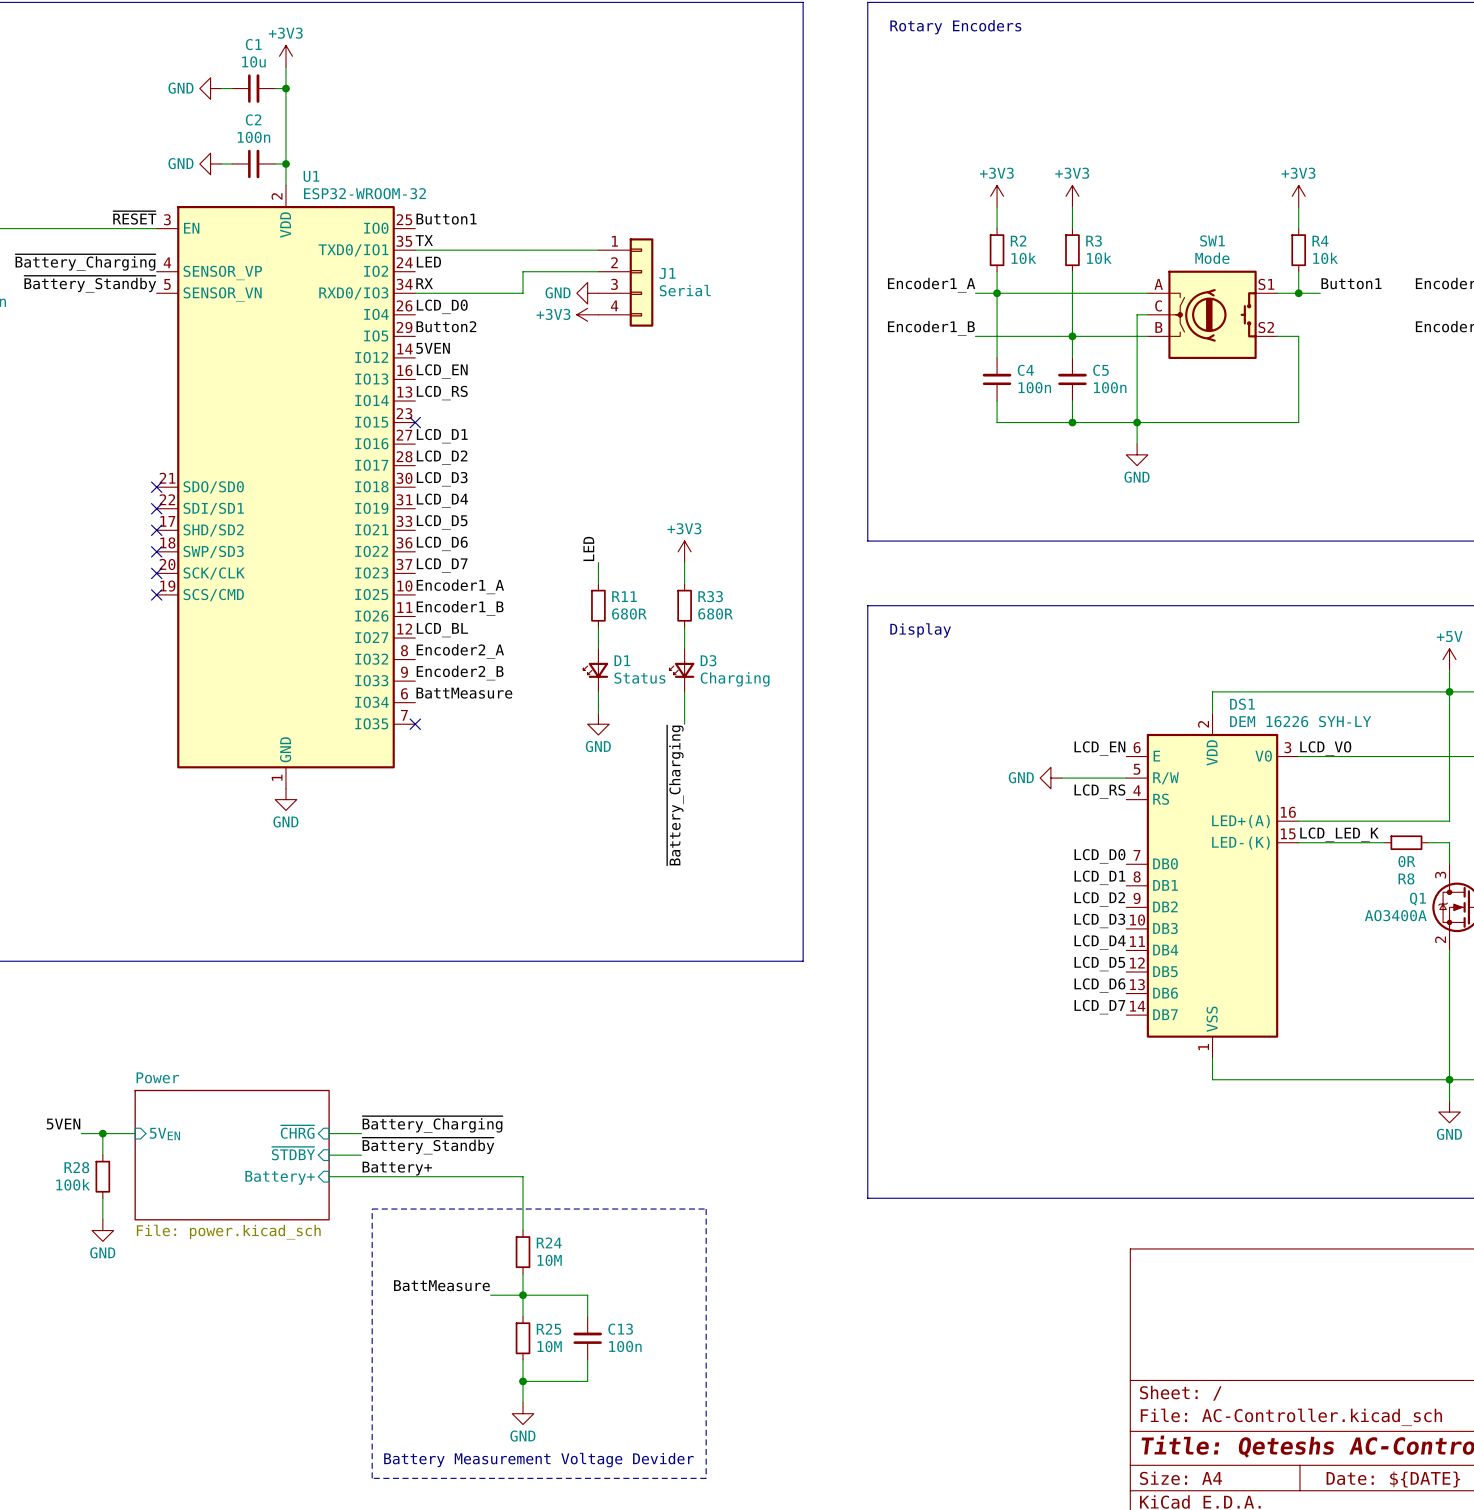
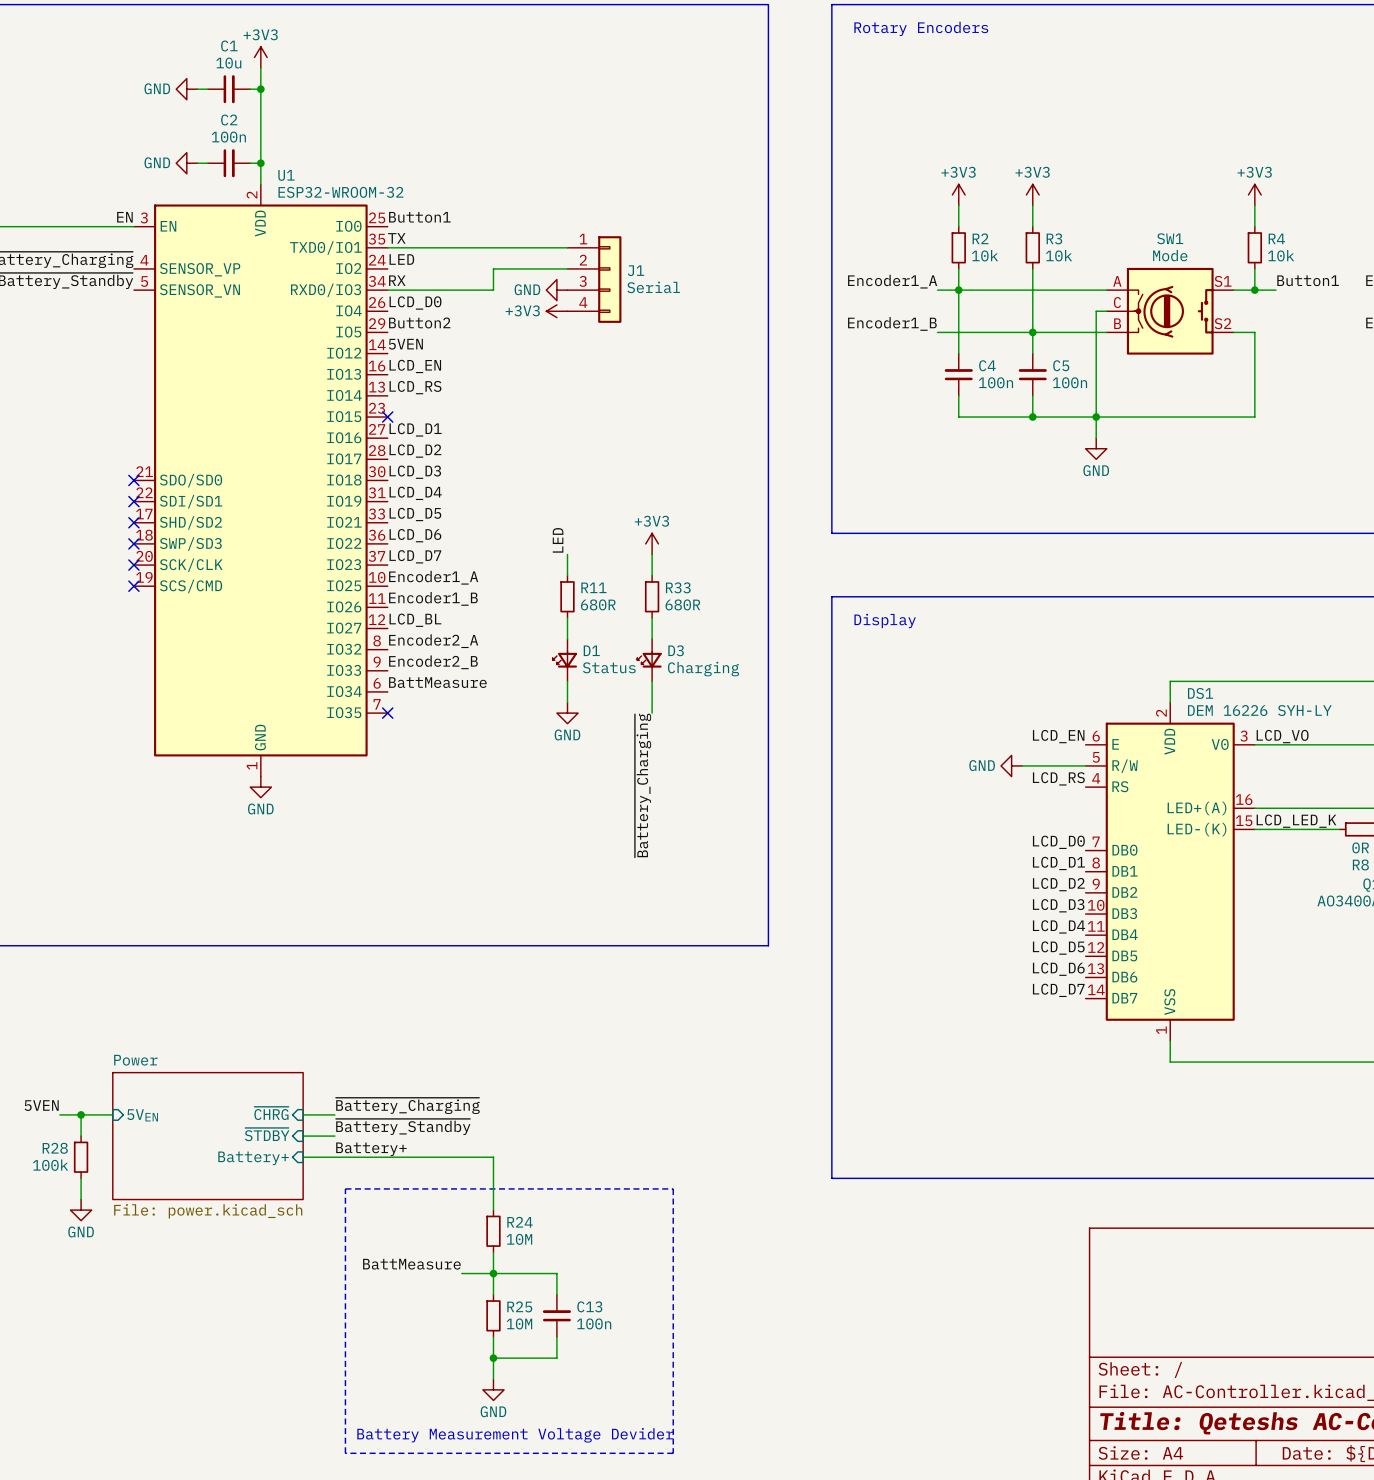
label: ~{RESET} (134, 217) -> EN (124, 217)

